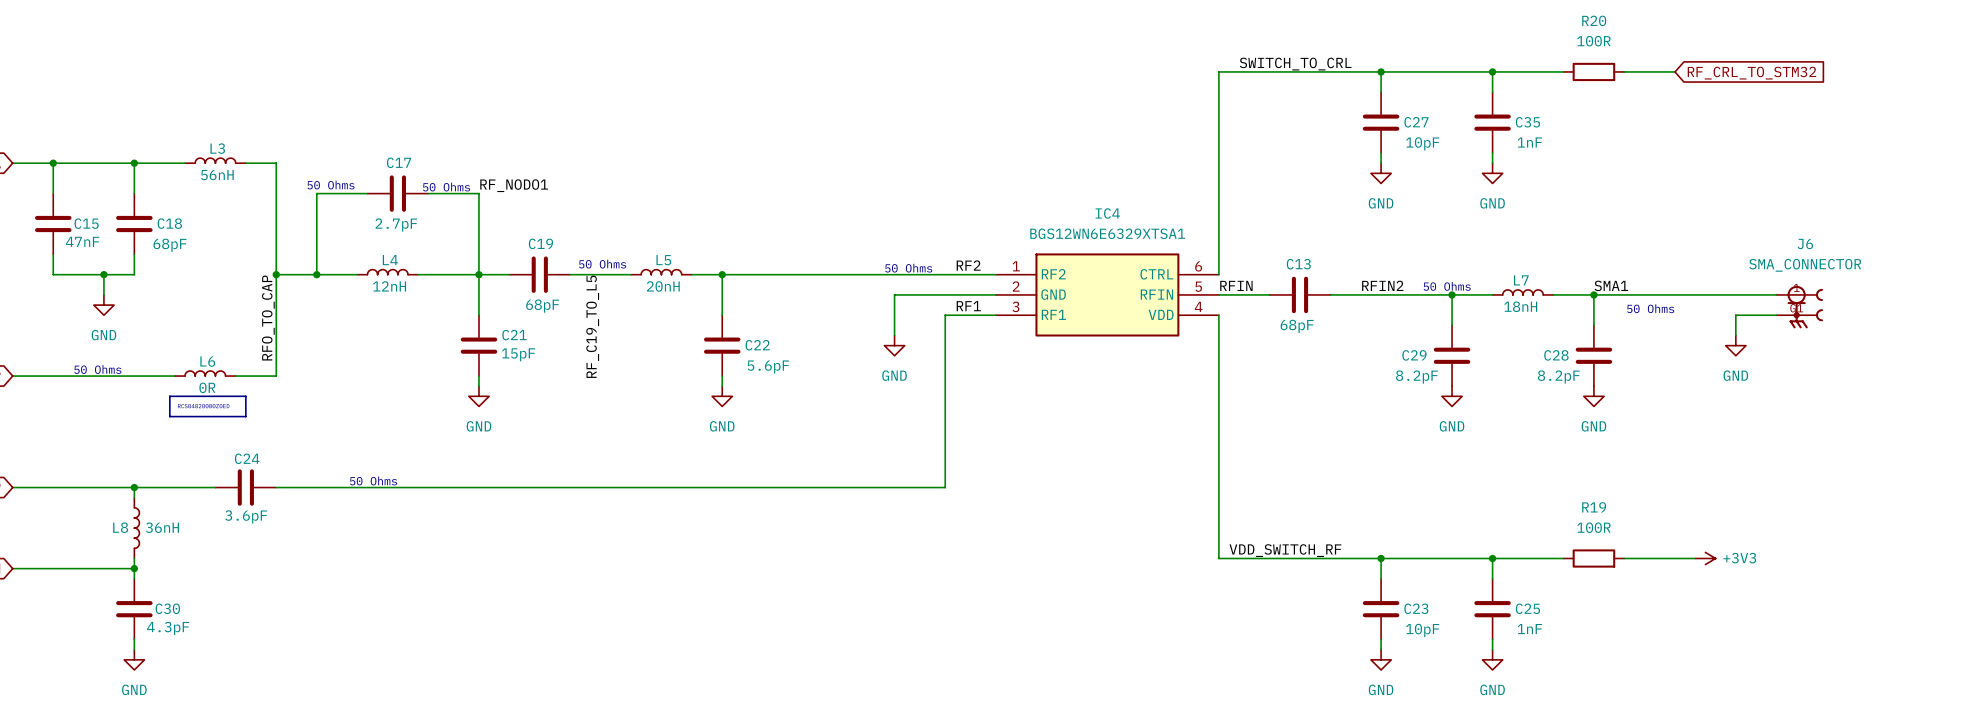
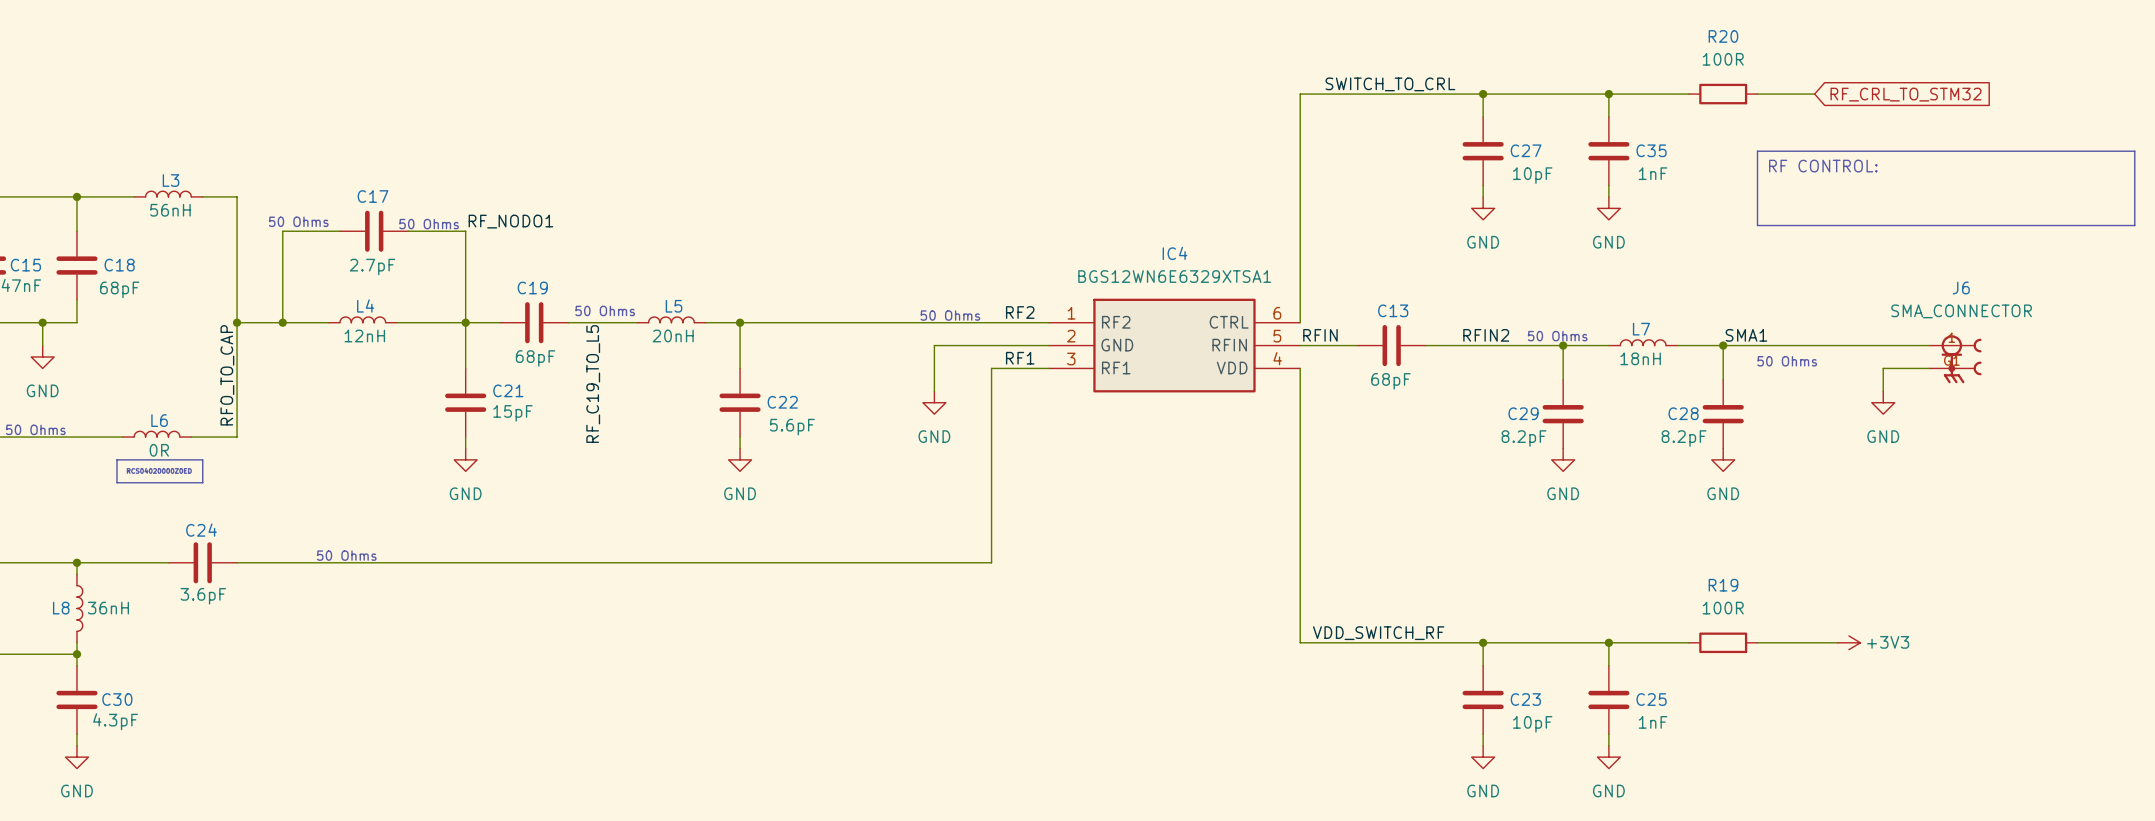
line: none -> (1757, 151) (2134, 151) (2134, 225) (1757, 225) (1757, 151)
text: none -> RF CONTROL: (1823, 166)

